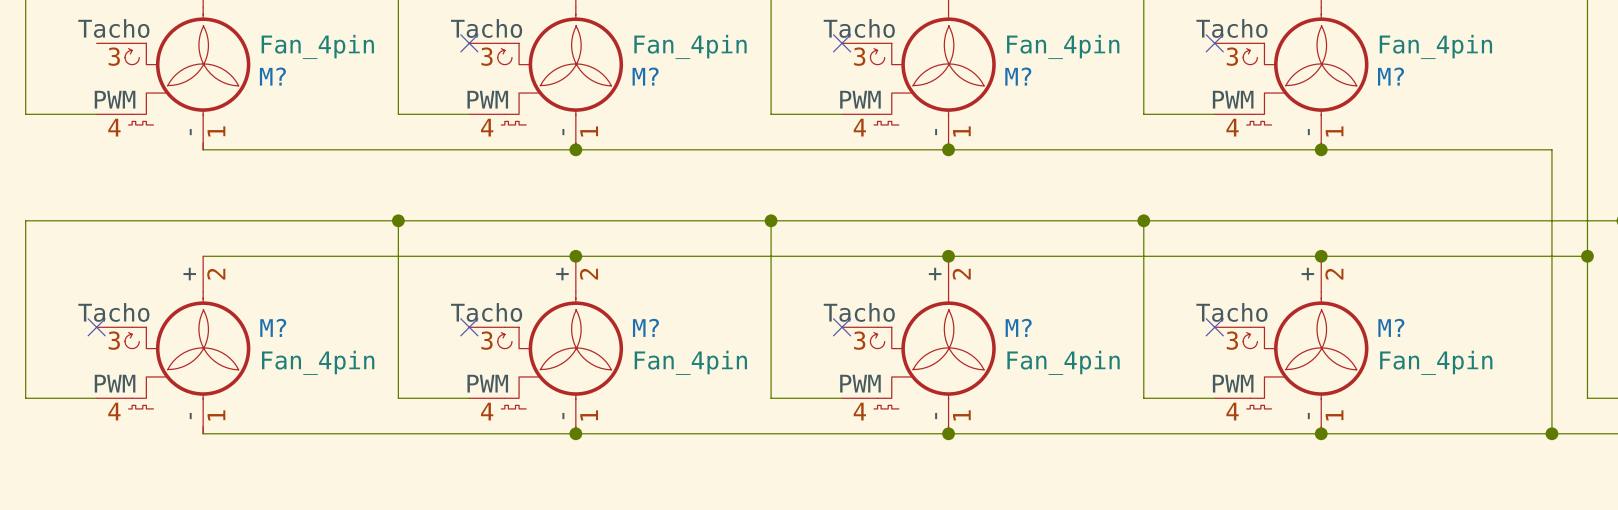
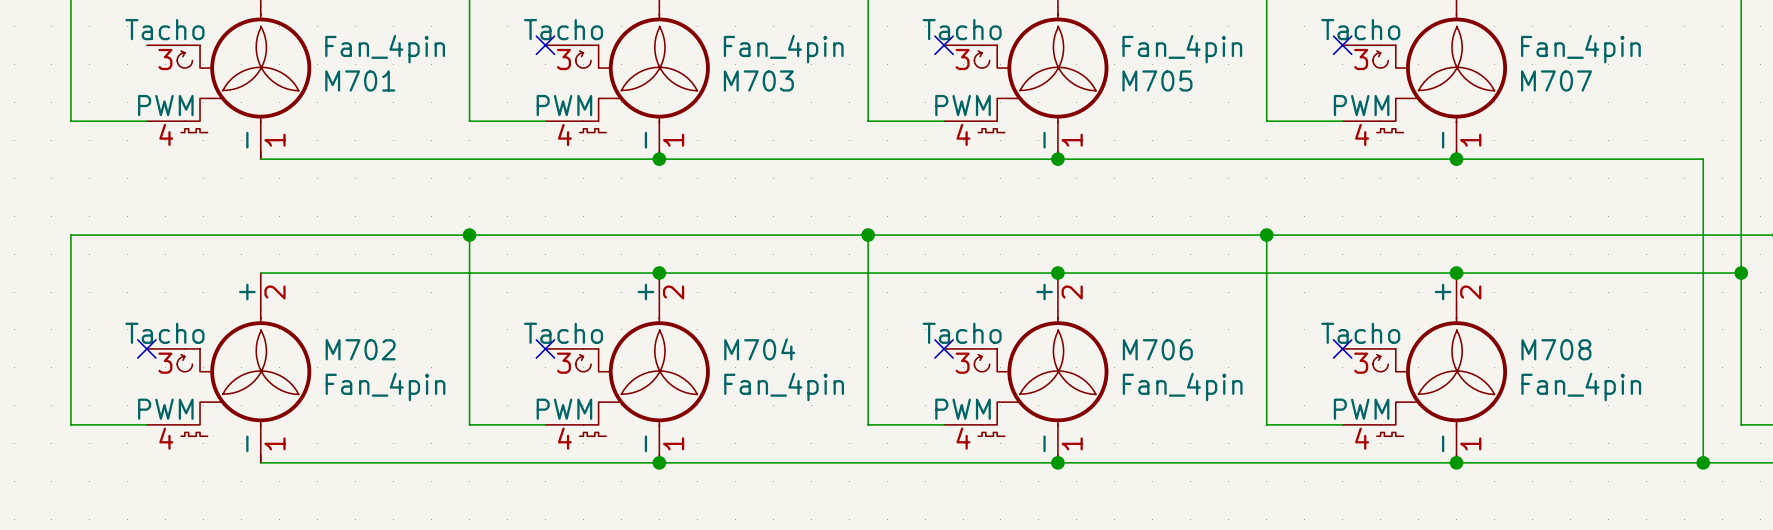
M? name: M? (272, 76) -> M701 (360, 81)
M? name: M? (645, 76) -> M703 (758, 81)
M? name: M? (1018, 76) -> M705 (1157, 81)
M? name: M? (1391, 76) -> M707 (1556, 81)
M? name: M? (273, 327) -> M702 (360, 349)
M? name: M? (645, 327) -> M704 (759, 349)
M? name: M? (1018, 327) -> M706 (1157, 349)
M? name: M? (1391, 327) -> M708 (1556, 349)

